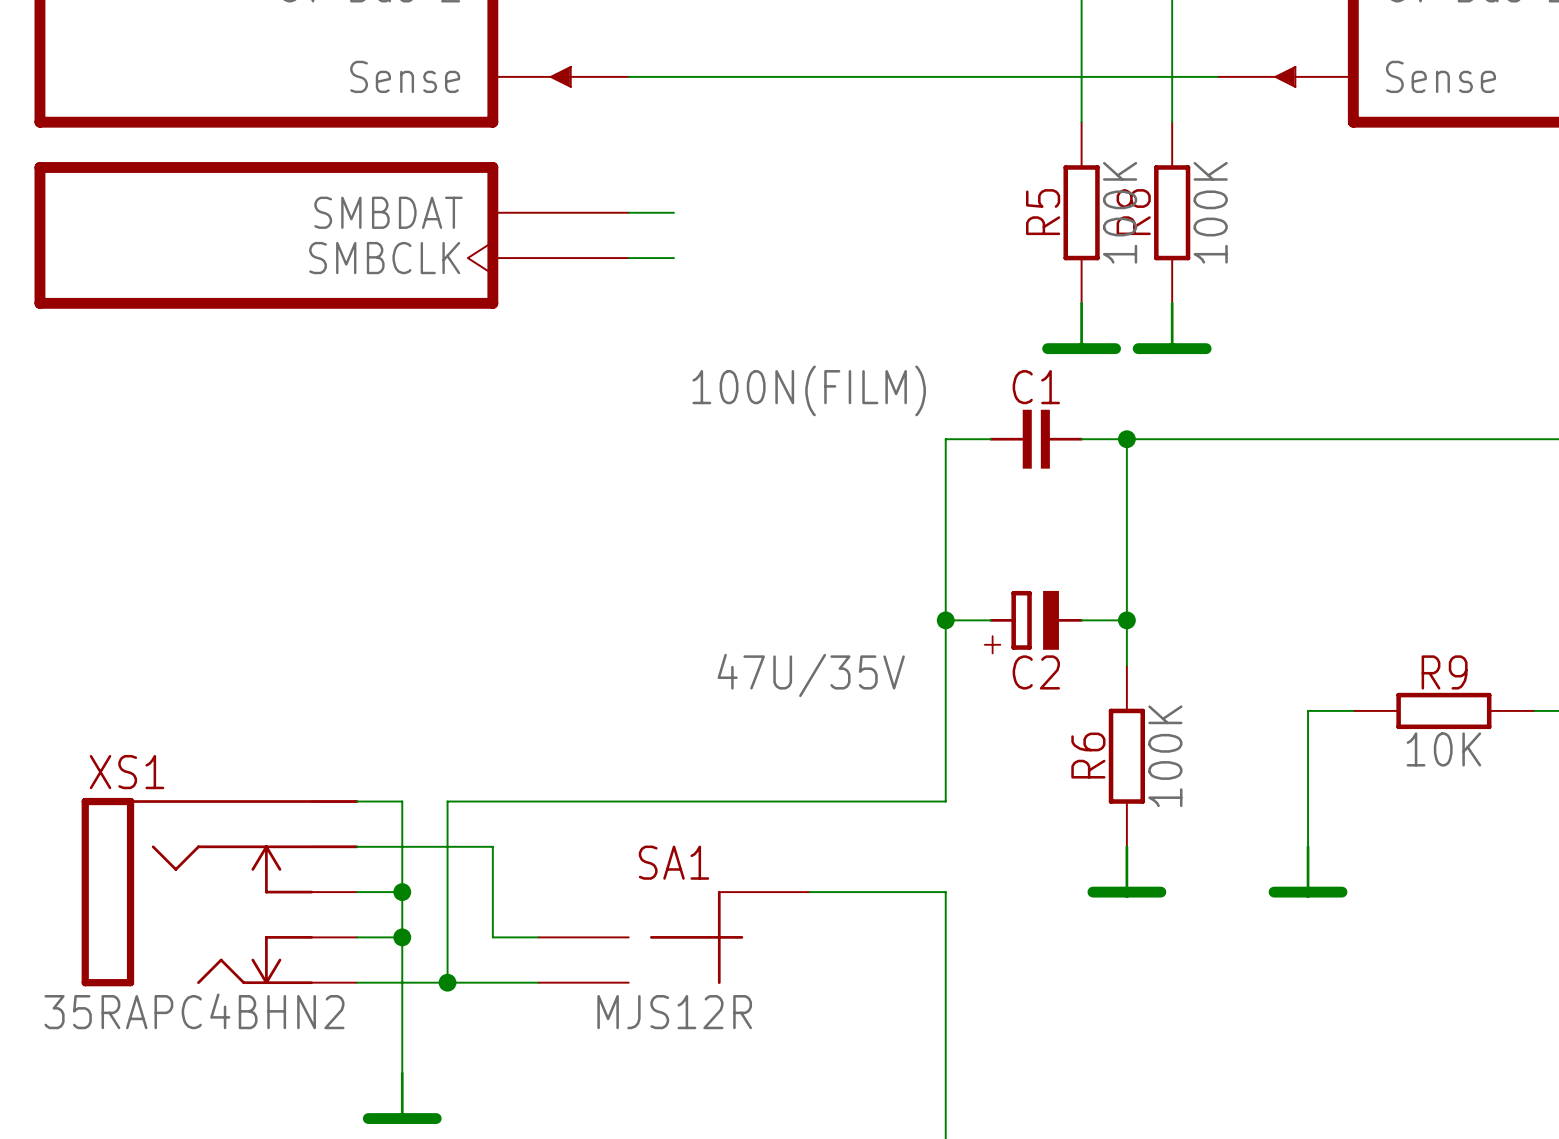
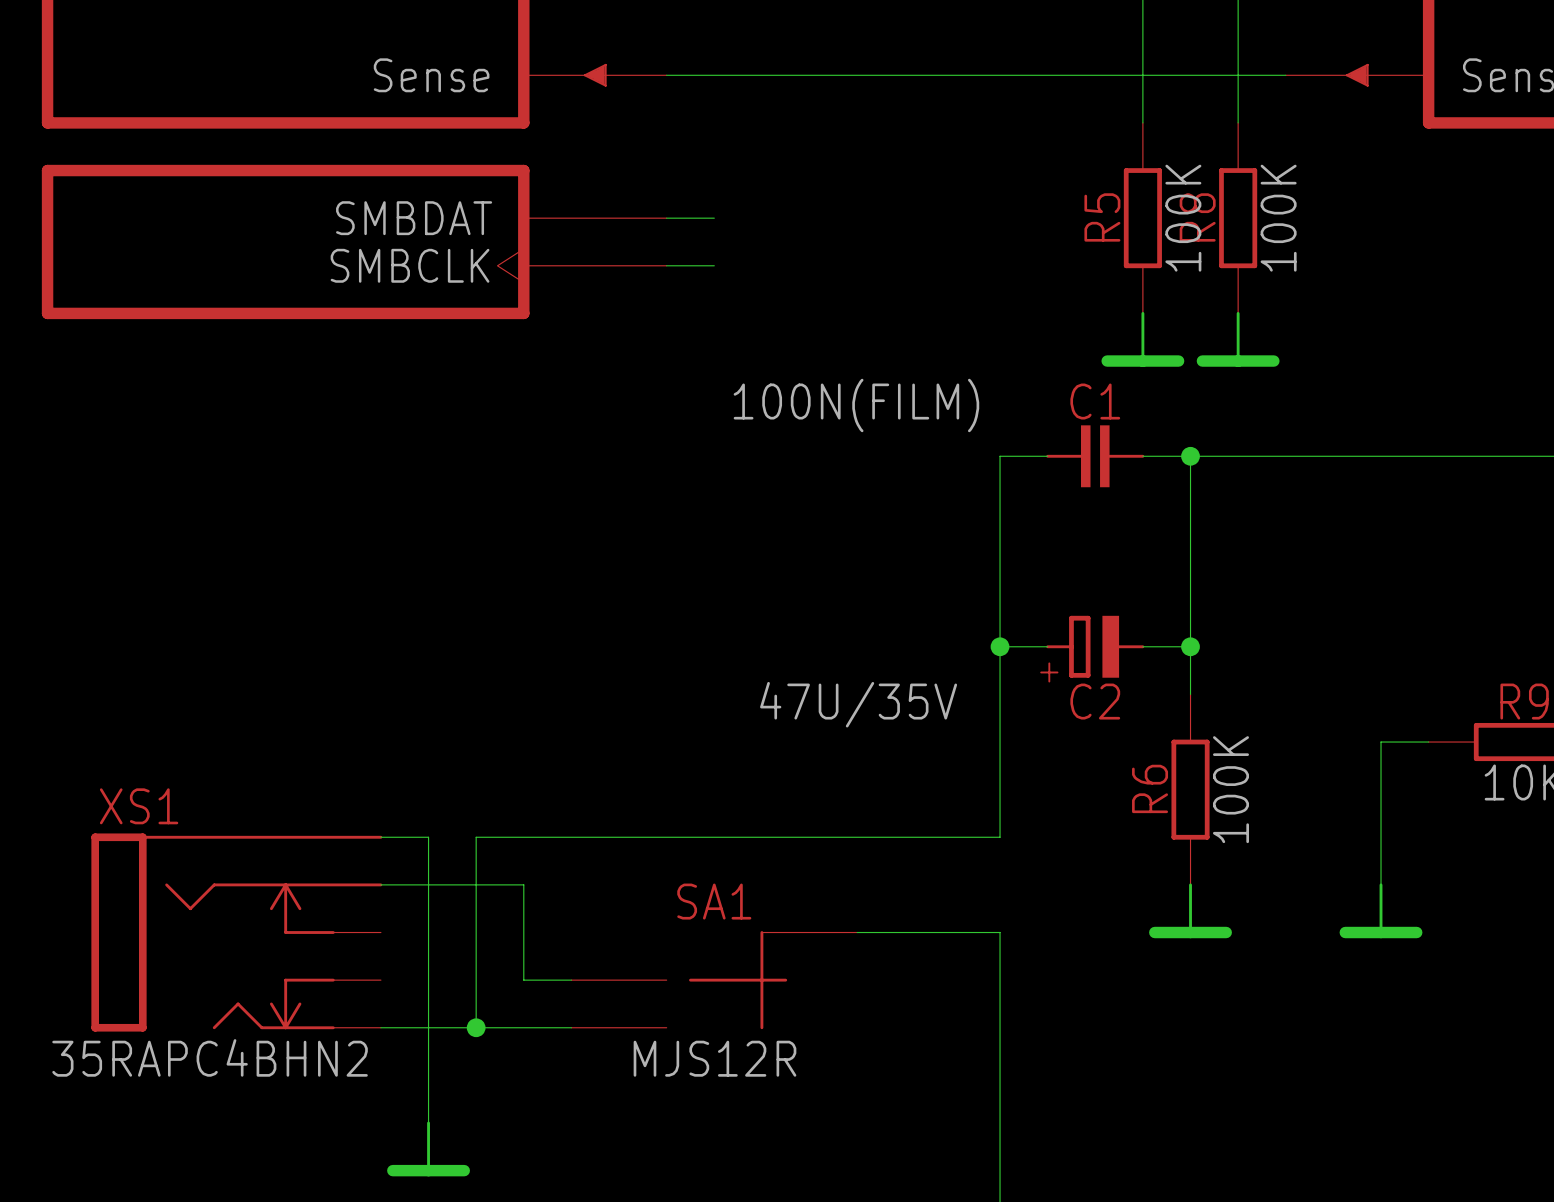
wire: (356, 892) (402, 892) -> none
junction: (402, 892) -> none
wire: (356, 937) (402, 937) -> none
junction: (402, 937) -> none

